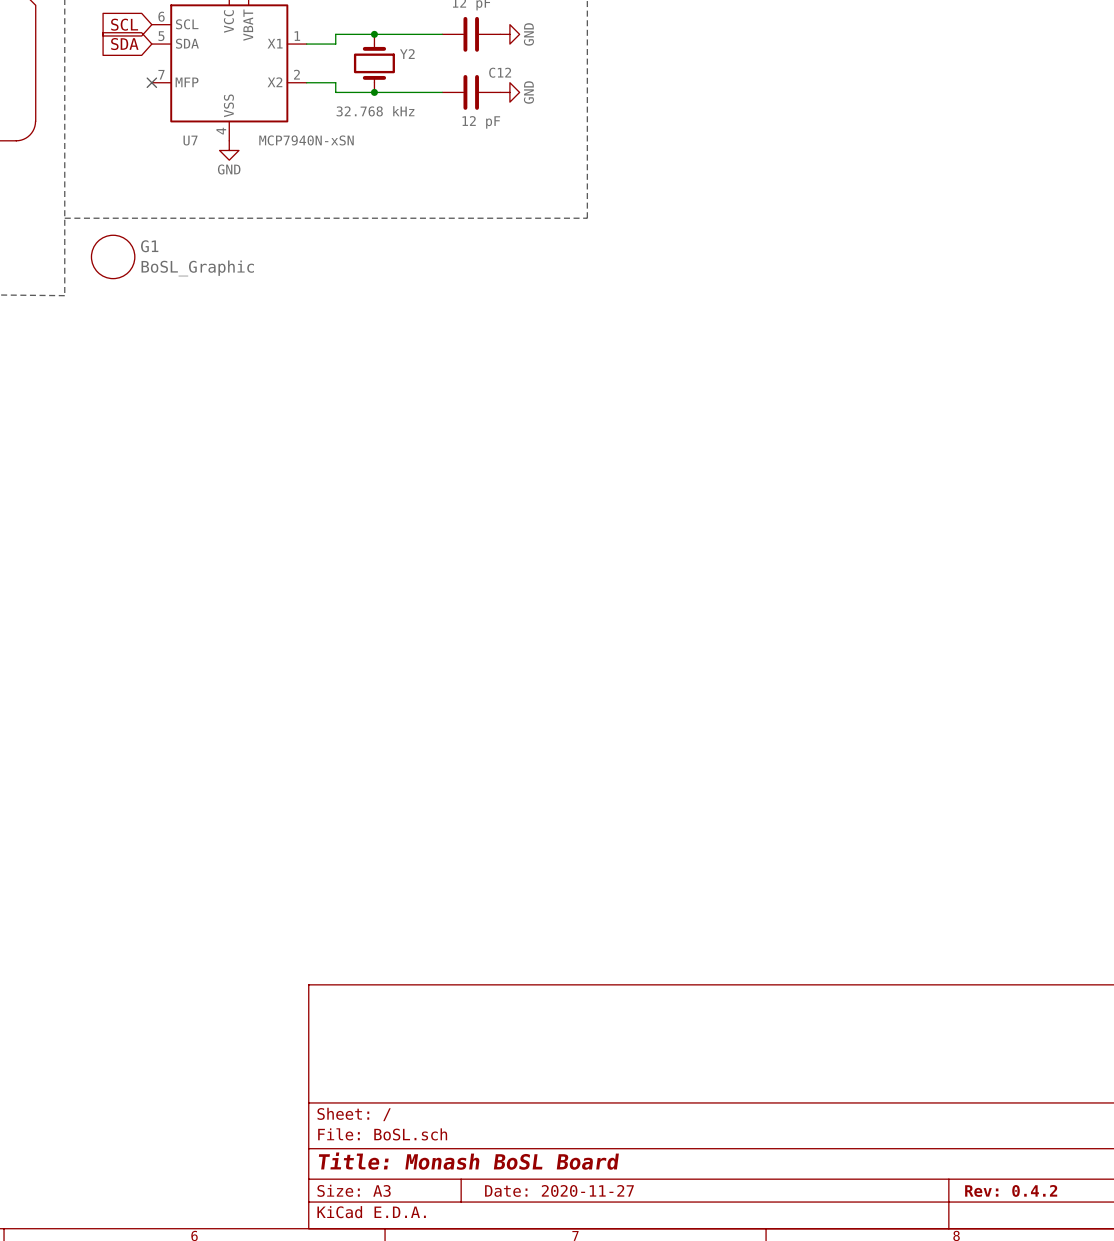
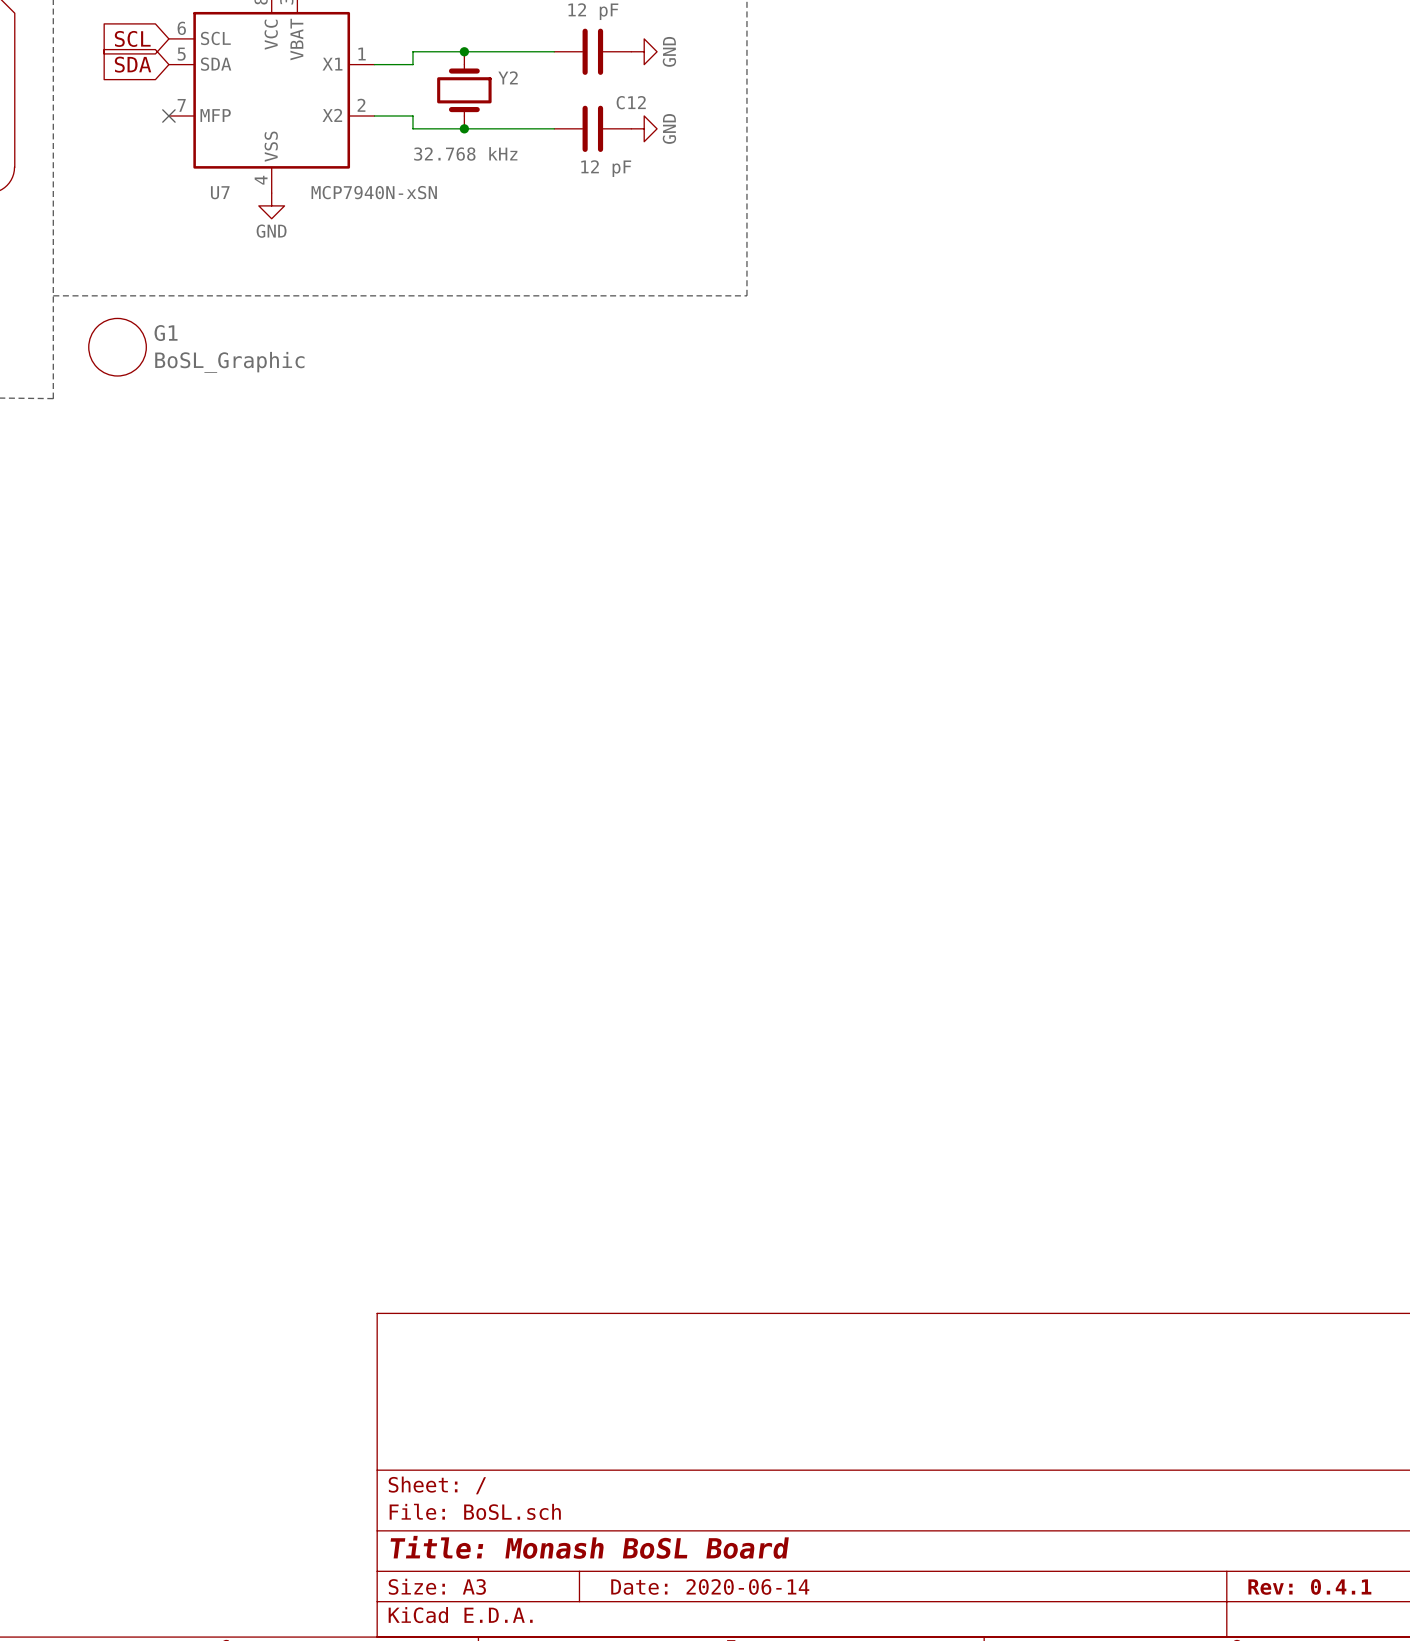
title block: Date: 2020-11-27 (559, 1190) -> Date: 2020-06-14 (710, 1586)
title block: Rev: 0.4.2 (1011, 1190) -> Rev: 0.4.1 (1309, 1586)

